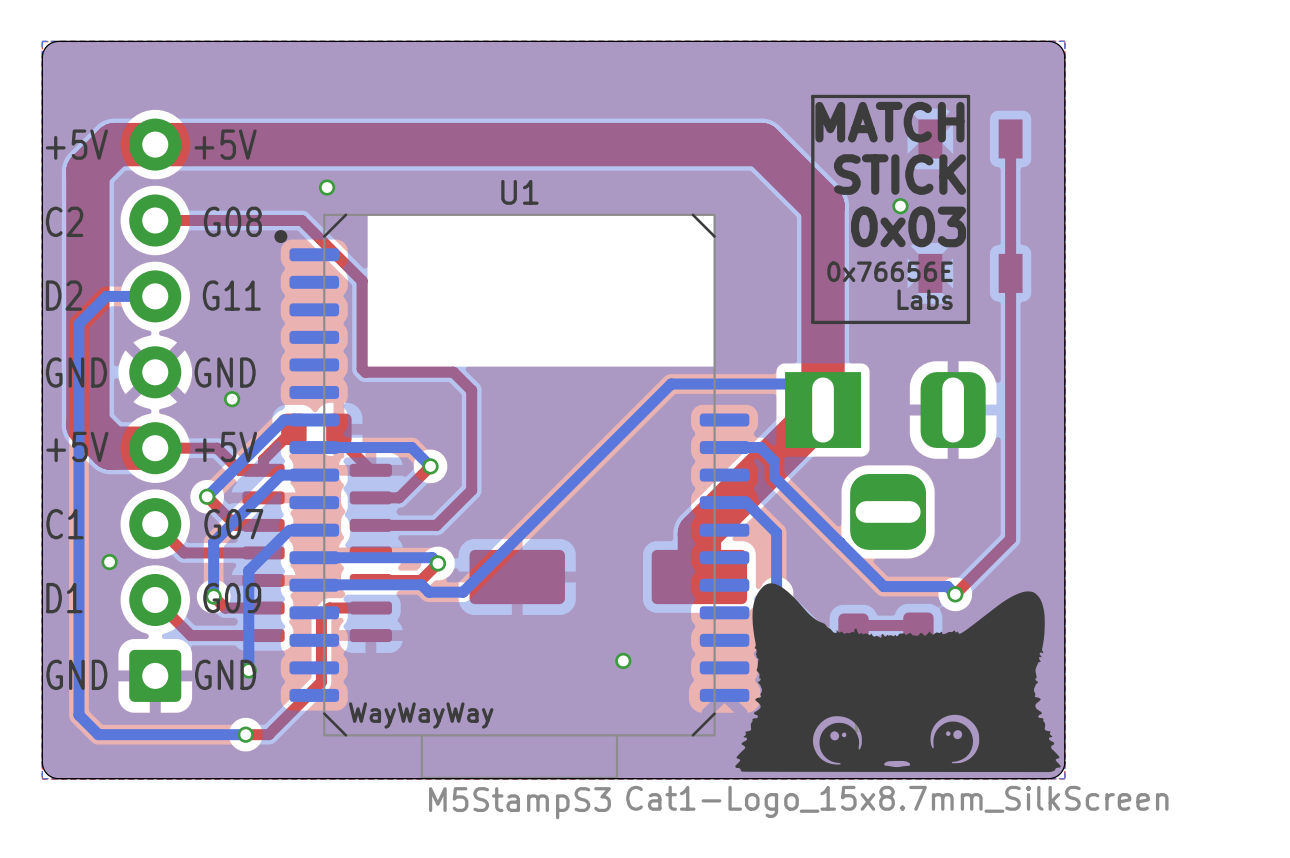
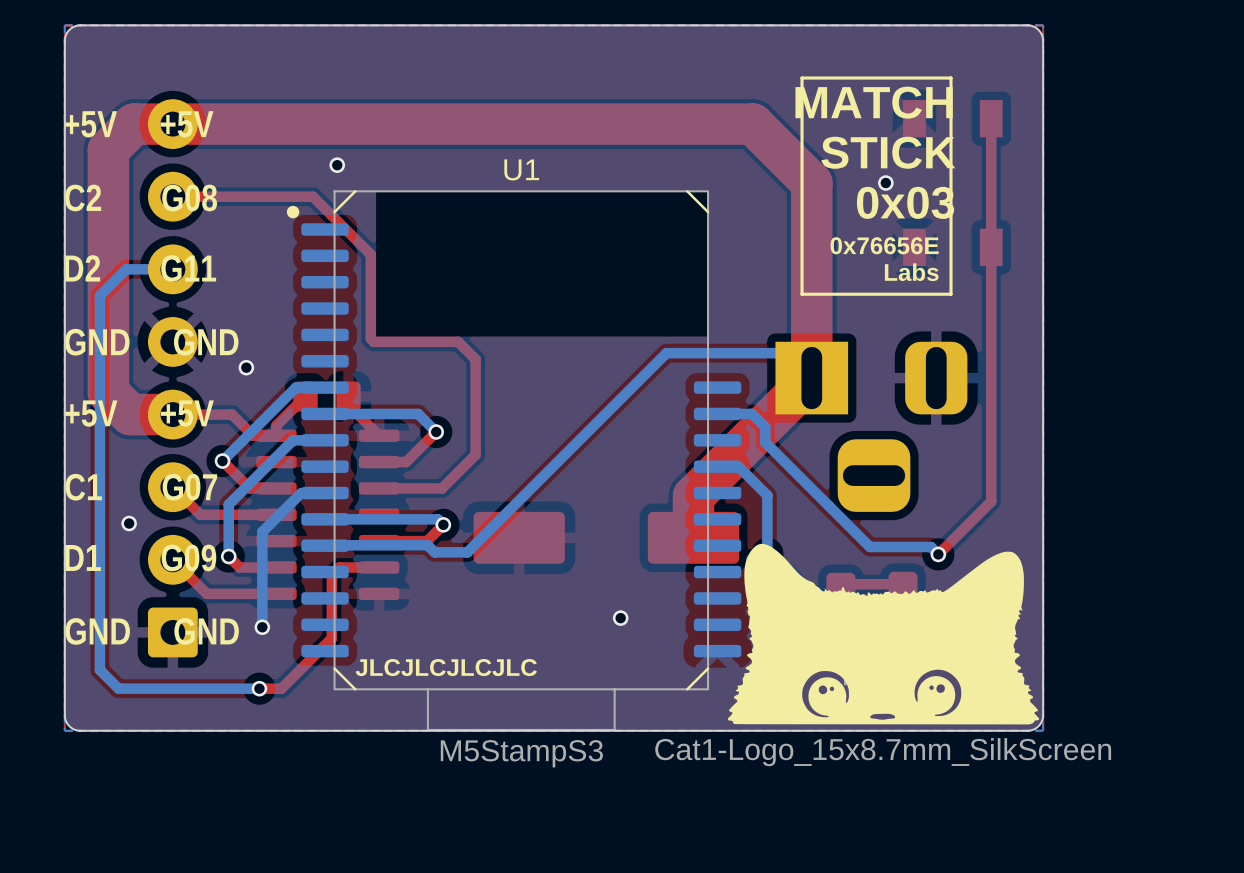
text: WayWayWay (421, 715) -> JLCJLCJLCJLC (446, 667)

